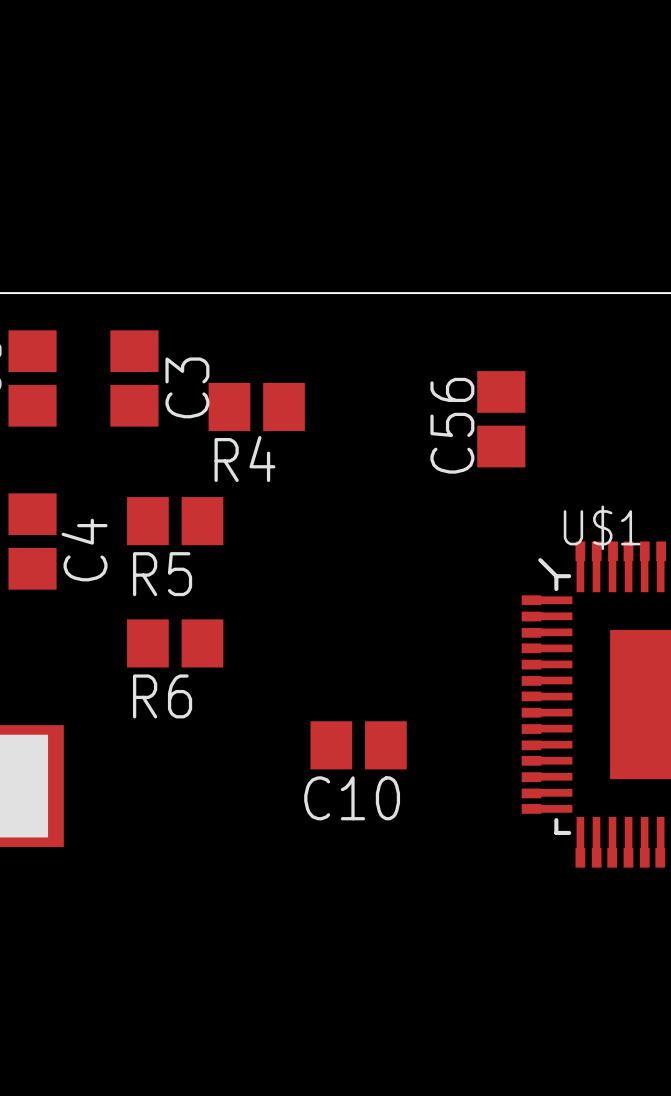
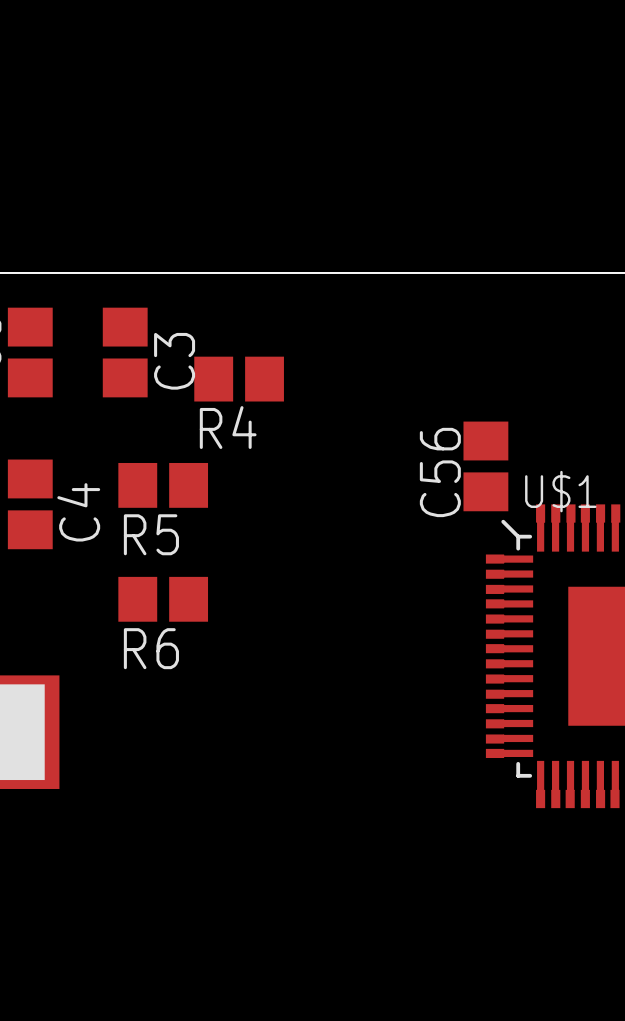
C56 position: (501, 419) -> (485, 466)
C10: (358, 745) -> none

